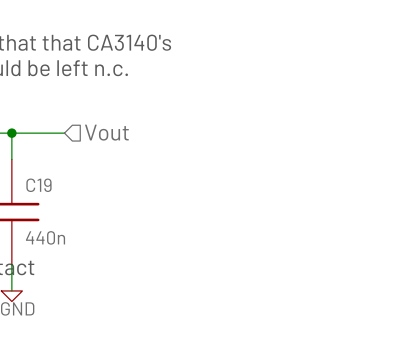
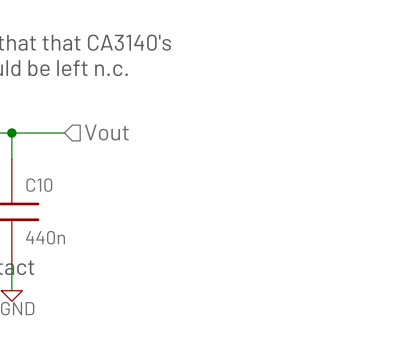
C19 name: C19 (38, 185) -> C10 (39, 185)

